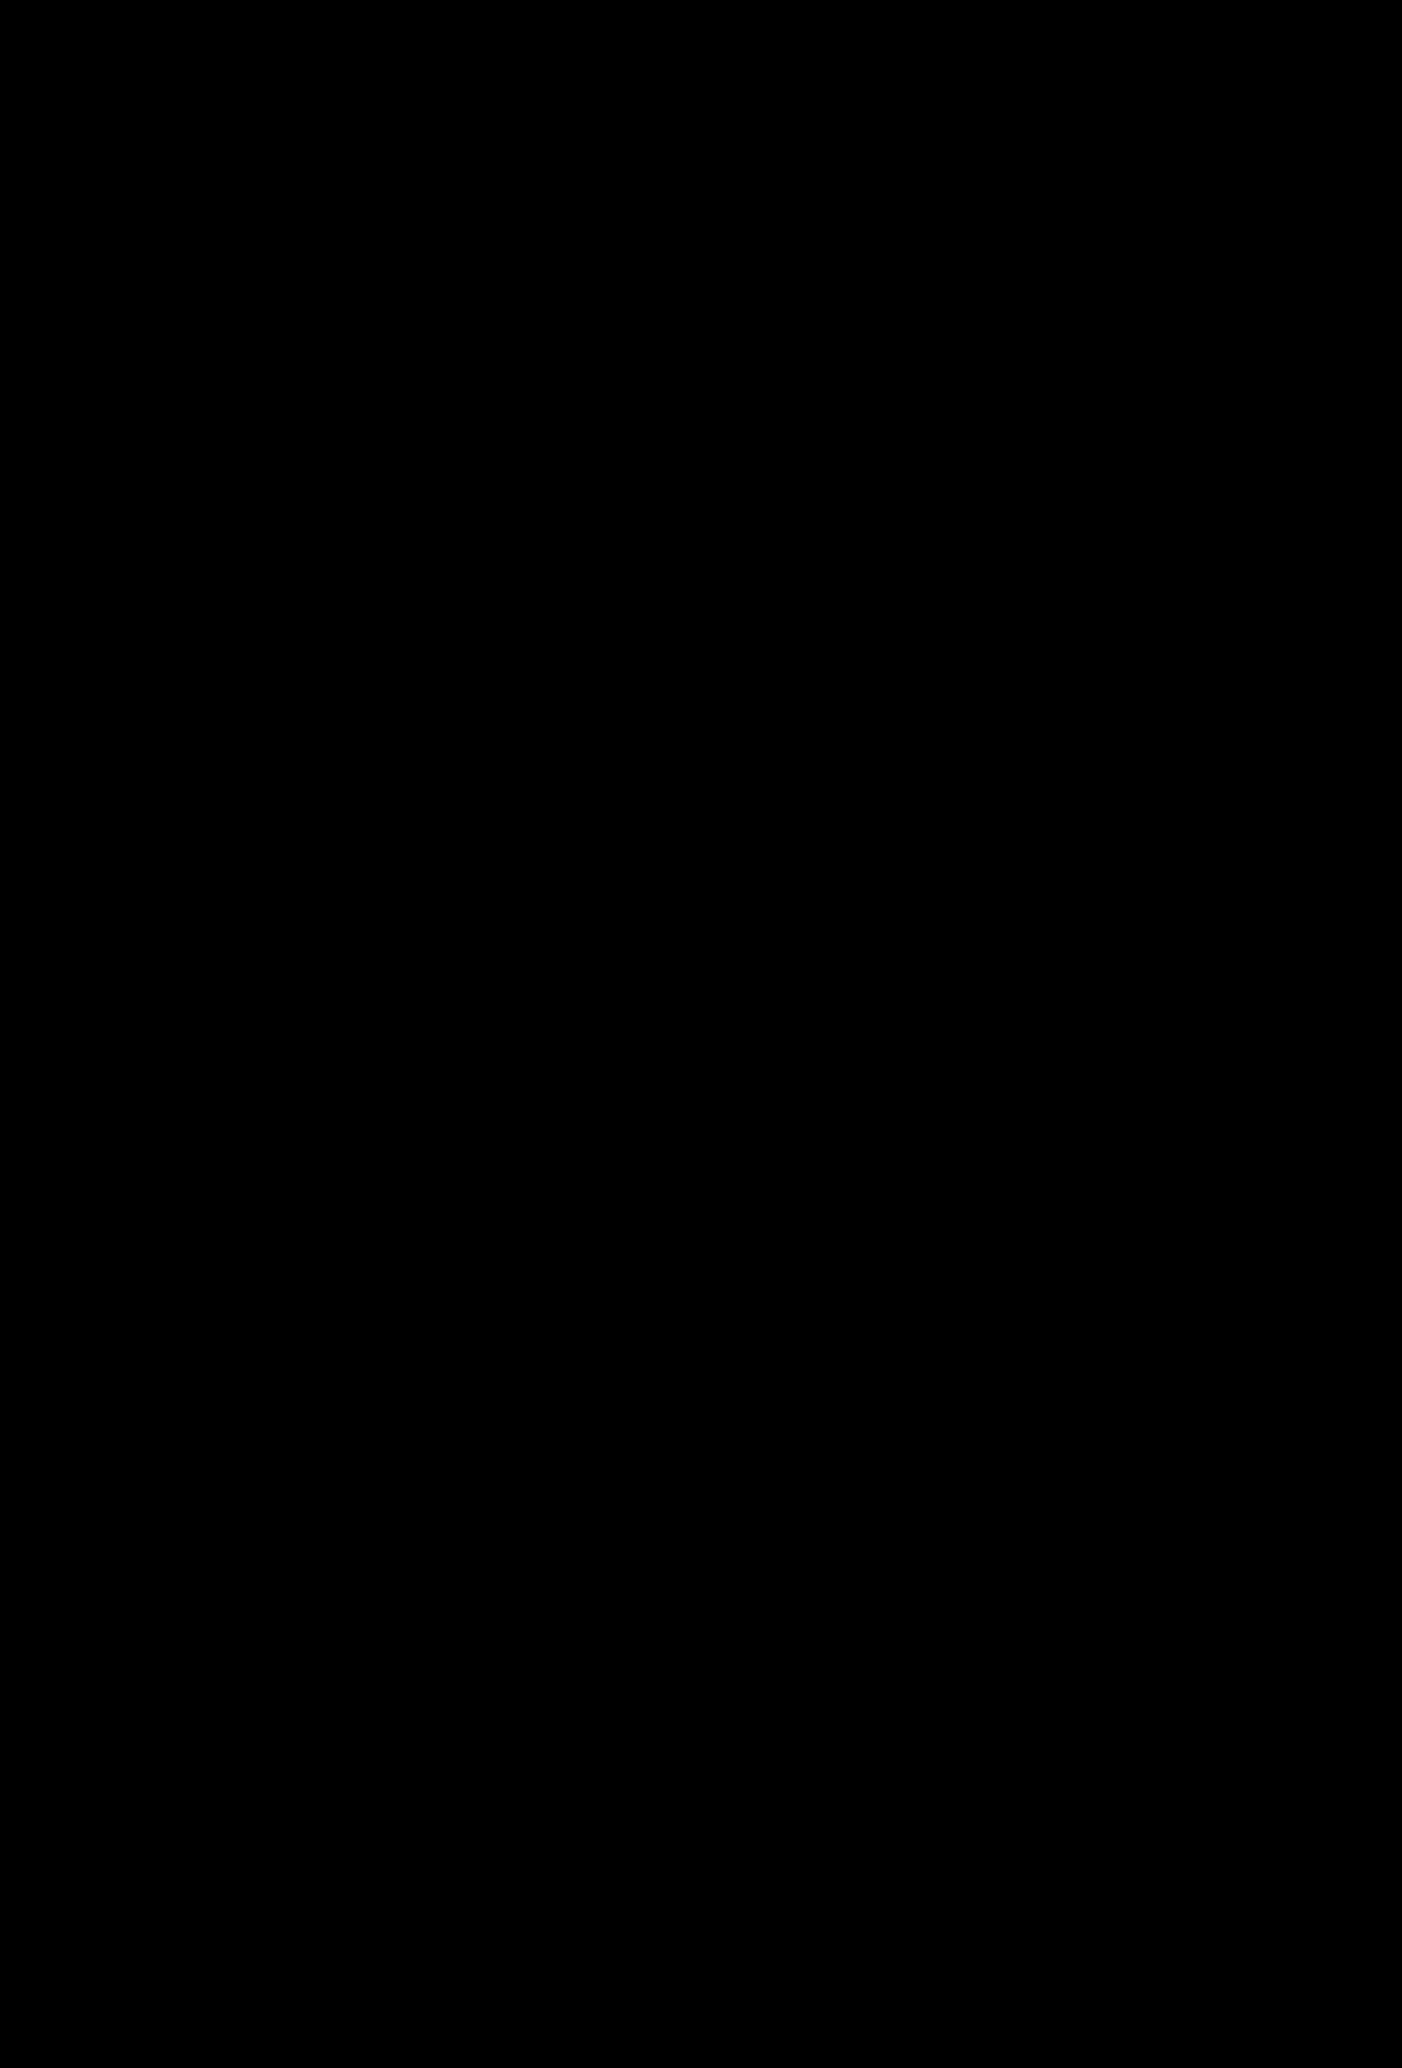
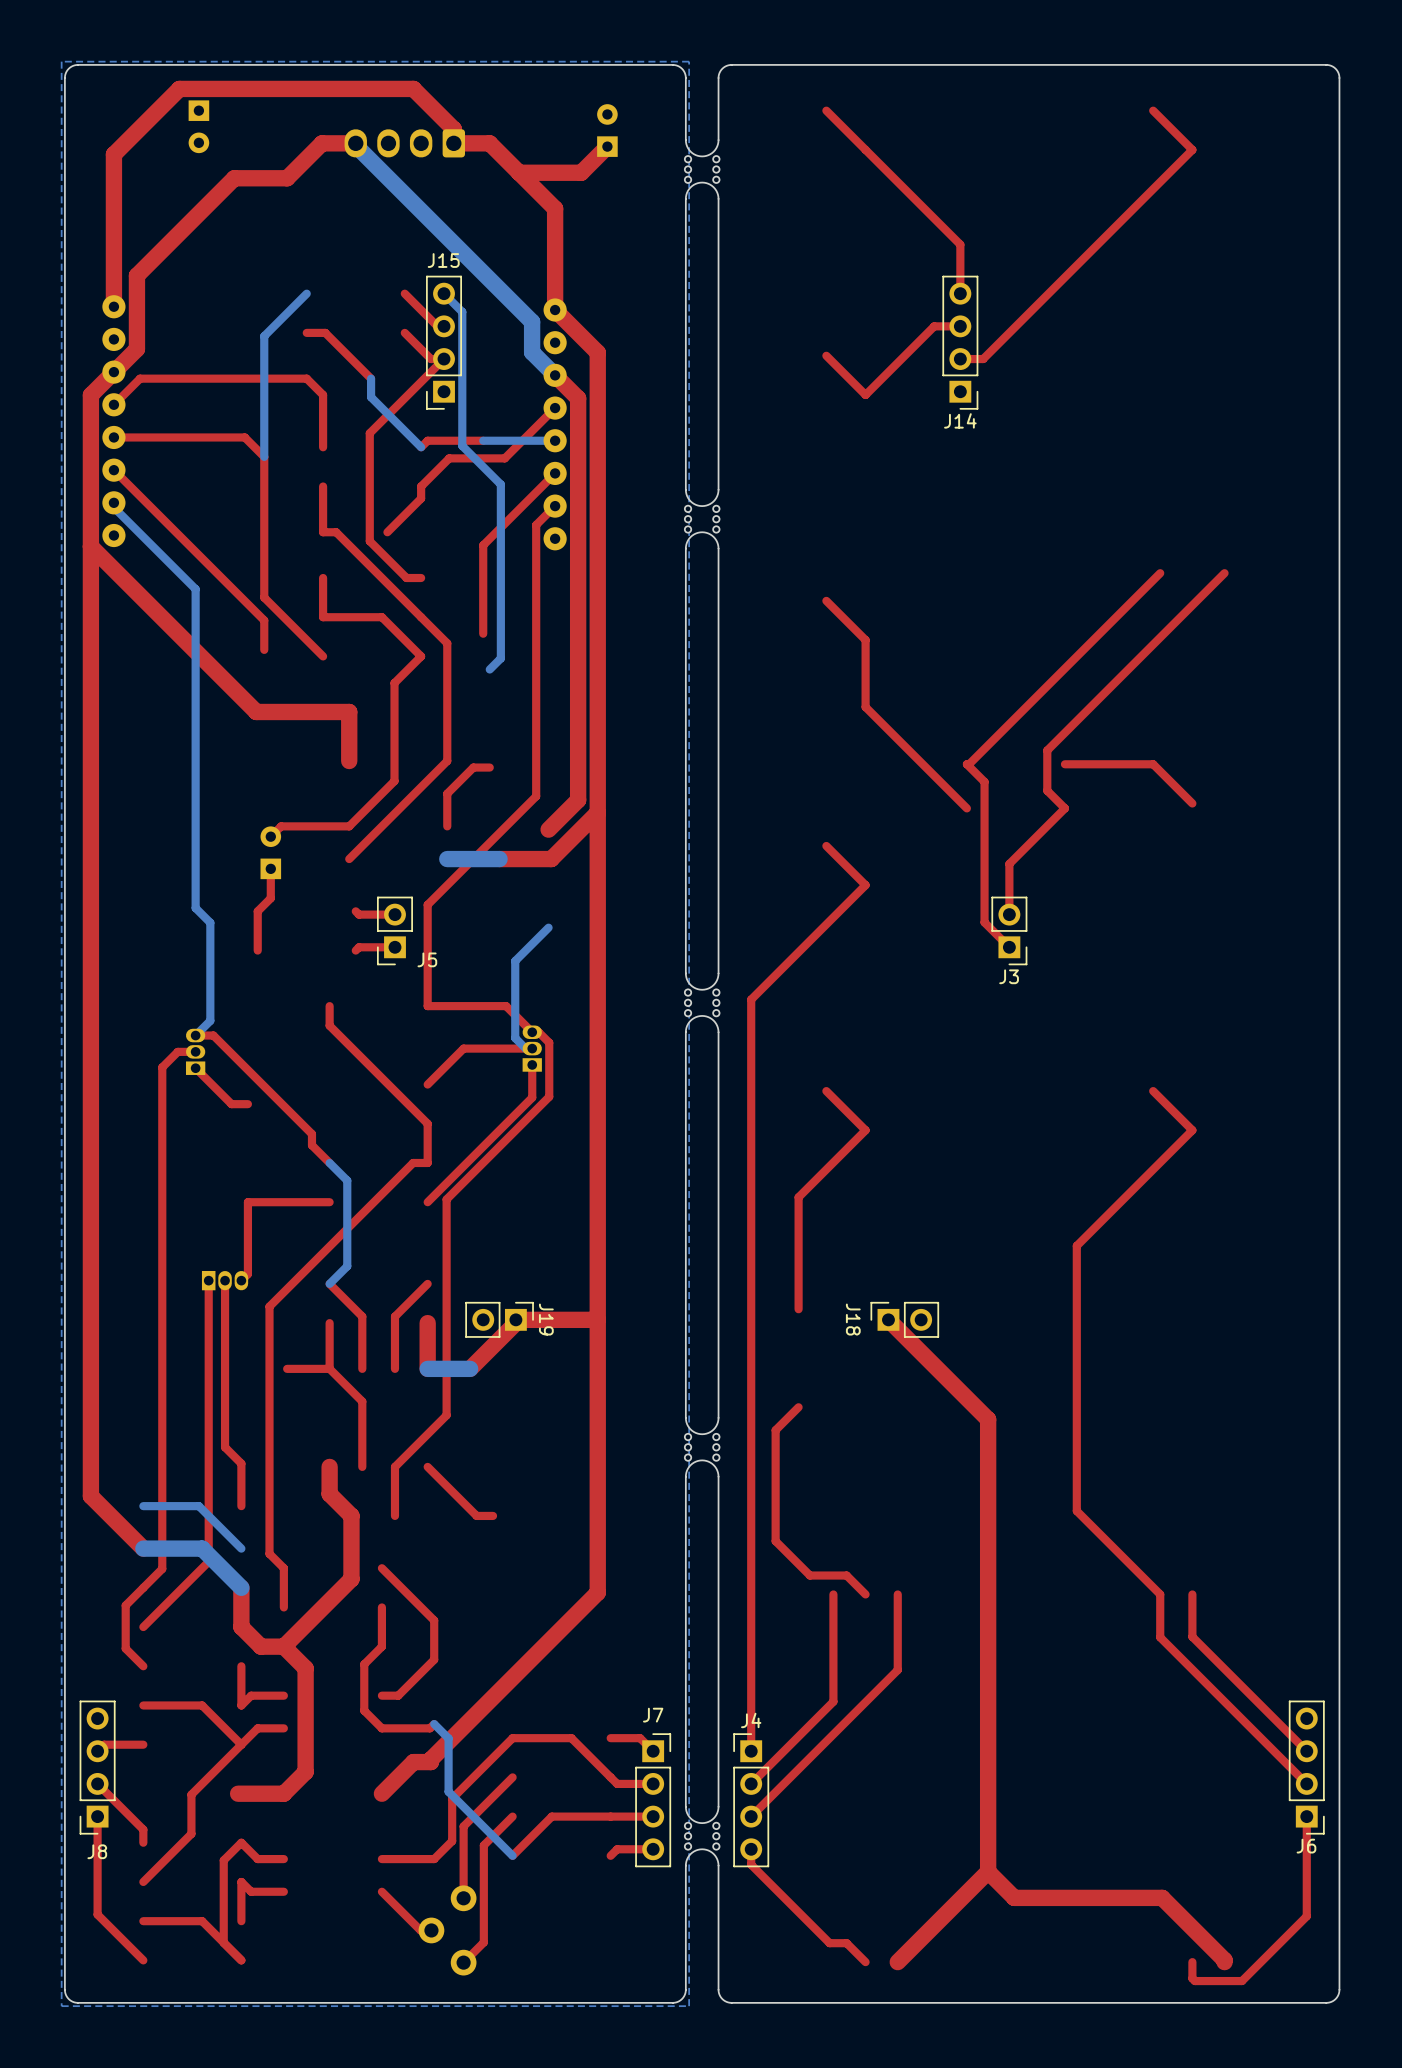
bottom zone outline: none -> (689, 61) (689, 2006) (61, 2006) (61, 61) (689, 61)
board edge: none -> (1326, 64) (729, 65) (722, 68) (718, 76) (717, 144) (712, 153) (702, 156) (692, 153) (686, 144) (685, 76) (682, 68) (674, 65) (77, 64) (71, 66) (66, 71) (64, 77) (64, 1989) (66, 1996) (71, 2001) (77, 2002) (676, 2002) (682, 1999) (685, 1991) (685, 1863) (690, 1854) (702, 1849) (713, 1854) (718, 1863) (718, 1991) (721, 1997) (728, 2002) (1326, 2002) (1332, 2001) (1337, 1996) (1339, 1989) (1339, 77) (1335, 68) (1326, 64)
top track: none -> (826, 110) (960, 244) (960, 293)
top track: none -> (1153, 110) (1192, 149) (983, 359) (960, 359)
part: none -> (198, 126)
part: none -> (607, 130)
part: none -> (404, 143)
top track: none -> (355, 145) (355, 143) (322, 143) (287, 178) (234, 178) (136, 275) (136, 349) (90, 395) (90, 1496) (143, 1548)
bottom track: none -> (355, 145) (532, 321) (532, 352) (555, 375)
top track: none -> (607, 146) (581, 172) (519, 172)
part: none -> (702, 169)
board edge: none -> (718, 198) (718, 489) (713, 501) (702, 506) (690, 501) (685, 489) (685, 198) (690, 187) (702, 182) (713, 187) (718, 198)
bottom track: none -> (306, 293) (264, 336) (264, 456)
top track: none -> (404, 293) (437, 326) (444, 326)
bottom track: none -> (444, 293) (462, 311) (462, 445) (500, 484) (500, 658) (489, 669)
top track: none -> (113, 306) (113, 154) (179, 88) (413, 88) (453, 129) (453, 143) (489, 143) (555, 208) (555, 310) (597, 352) (597, 1592) (430, 1759) (430, 1762) (413, 1762) (381, 1793)
top track: none -> (960, 326) (934, 326) (865, 394) (826, 355)
top track: none -> (306, 332) (325, 332) (371, 378)
top track: none -> (404, 332) (430, 359) (444, 359) (369, 433) (369, 541) (406, 578) (421, 578)
J15: none -> (444, 342)
J14: none -> (960, 342)
top track: none -> (555, 375) (578, 398) (578, 800) (548, 829)
bottom track: none -> (371, 378) (371, 397) (421, 447)
top track: none -> (113, 404) (140, 378) (306, 378) (323, 394) (323, 447)
top track: none -> (555, 408) (504, 458) (449, 458) (421, 486) (421, 498) (387, 532)
part: none -> (113, 421)
part: none -> (555, 424)
top track: none -> (113, 437) (244, 437) (264, 456) (264, 597) (323, 656)
top track: none -> (483, 440) (427, 440) (421, 447)
bottom track: none -> (555, 440) (483, 440)
top track: none -> (113, 470) (264, 620) (264, 649)
top track: none -> (555, 473) (483, 545) (483, 633)
top track: none -> (323, 486) (323, 532) (336, 532) (447, 643) (447, 761) (349, 859)
bottom track: none -> (113, 502) (113, 507) (195, 589) (195, 908) (210, 922) (210, 1020) (195, 1035)
top track: none -> (555, 506) (536, 525) (536, 796) (427, 904) (427, 1006) (506, 1006) (532, 1032) (538, 1032) (549, 1042) (549, 1096) (446, 1199) (446, 1415) (394, 1466) (394, 1515)
part: none -> (702, 519)
top track: none -> (90, 546) (256, 711) (349, 711) (349, 761)
board edge: none -> (718, 548) (718, 973) (713, 984) (702, 989) (690, 984) (685, 973) (685, 548) (690, 537) (702, 532) (713, 537) (718, 548)
top track: none -> (1160, 573) (969, 764) (966, 764) (984, 781) (984, 922) (1009, 947)
top track: none -> (1224, 573) (1047, 750) (1047, 790) (1064, 808) (1009, 863) (1009, 914)
top track: none -> (323, 578) (323, 617) (381, 617) (421, 656) (394, 683) (394, 781) (349, 826) (281, 826) (270, 836)
top track: none -> (826, 600) (865, 640) (865, 707) (966, 808)
top track: none -> (1064, 764) (1153, 764) (1192, 803)
top track: none -> (489, 767) (473, 767) (447, 793) (447, 826)
top track: none -> (597, 812) (551, 859) (499, 859)
top track: none -> (826, 845) (865, 885) (751, 999) (751, 1751)
part: none -> (270, 852)
bottom track: none -> (499, 859) (447, 859)
top track: none -> (270, 868) (270, 898) (257, 911) (257, 950)
top track: none -> (355, 911) (359, 914) (394, 914)
bottom track: none -> (548, 927) (515, 961) (515, 1038) (525, 1048) (532, 1048)
J5: none -> (394, 930)
J3: none -> (1009, 930)
top track: none -> (394, 947) (359, 947) (355, 950)
part: none -> (702, 1002)
top track: none -> (329, 1006) (329, 1025) (427, 1123) (427, 1162) (413, 1162) (269, 1306) (269, 1553) (283, 1568) (283, 1607)
board edge: none -> (718, 1032) (718, 1417) (713, 1429) (702, 1434) (690, 1429) (685, 1417) (685, 1032) (690, 1020) (702, 1015) (713, 1020) (718, 1032)
top track: none -> (195, 1035) (213, 1035) (311, 1134) (311, 1145) (329, 1162)
top track: none -> (532, 1048) (463, 1048) (427, 1084)
part: none -> (532, 1048)
top track: none -> (195, 1051) (177, 1051) (162, 1067) (162, 1568) (125, 1605) (125, 1648) (143, 1666)
part: none -> (195, 1051)
top track: none -> (532, 1064) (532, 1097) (427, 1202)
top track: none -> (195, 1068) (231, 1104) (247, 1104)
top track: none -> (826, 1091) (865, 1130) (798, 1197) (798, 1309)
top track: none -> (1153, 1091) (1192, 1130) (1076, 1245) (1076, 1511) (1160, 1594) (1160, 1637) (1306, 1783)
bottom track: none -> (329, 1162) (347, 1180) (347, 1266) (329, 1283)
top track: none -> (329, 1202) (247, 1202) (247, 1274) (241, 1280)
top track: none -> (208, 1280) (208, 1561) (143, 1627)
top track: none -> (225, 1280) (225, 1447) (241, 1463) (241, 1506)
part: none -> (225, 1280)
top track: none -> (329, 1283) (362, 1316) (362, 1368)
top track: none -> (427, 1283) (394, 1316) (394, 1368)
J19: none -> (499, 1319)
top track: none -> (597, 1319) (515, 1319) (515, 1323) (470, 1368)
top track: none -> (888, 1319) (988, 1419) (988, 1871)
J18: none -> (904, 1319)
top track: none -> (329, 1323) (329, 1368)
top track: none -> (427, 1323) (427, 1368)
top track: none -> (329, 1368) (362, 1401) (362, 1466)
top track: none -> (329, 1368) (287, 1368)
bottom track: none -> (470, 1368) (427, 1368)
top track: none -> (798, 1407) (775, 1430) (775, 1541) (809, 1575) (846, 1575) (865, 1594)
part: none -> (702, 1447)
top track: none -> (329, 1466) (329, 1494) (351, 1515) (351, 1579) (283, 1646)
top track: none -> (427, 1466) (476, 1515) (493, 1515)
board edge: none -> (718, 1476) (718, 1806) (713, 1818) (702, 1823) (690, 1818) (685, 1806) (685, 1476) (690, 1465) (702, 1460) (713, 1465) (718, 1476)
bottom track: none -> (143, 1506) (198, 1506) (241, 1548)
bottom track: none -> (143, 1548) (202, 1548) (241, 1587)
top track: none -> (381, 1568) (434, 1620) (434, 1659) (398, 1695) (381, 1695)
top track: none -> (241, 1587) (241, 1627) (261, 1646) (283, 1646)
top track: none -> (833, 1594) (833, 1701) (751, 1783)
top track: none -> (897, 1594) (897, 1670) (751, 1816)
top track: none -> (1192, 1594) (1192, 1636) (1306, 1751)
top track: none -> (381, 1607) (381, 1646) (364, 1664) (364, 1710) (381, 1728) (429, 1728) (434, 1724)
top track: none -> (283, 1646) (305, 1668) (305, 1771) (283, 1793) (238, 1793)
top track: none -> (241, 1666) (241, 1705) (251, 1695) (283, 1695)
top track: none -> (143, 1705) (202, 1705) (241, 1744)
bottom track: none -> (434, 1724) (448, 1738) (448, 1791) (512, 1855)
top track: none -> (283, 1728) (257, 1728) (191, 1794) (191, 1833) (143, 1881)
top track: none -> (610, 1738) (640, 1738) (653, 1751)
top track: none -> (143, 1744) (104, 1744) (97, 1751)
J8: none -> (97, 1767)
J6: none -> (1306, 1767)
top track: none -> (512, 1777) (463, 1826) (463, 1898)
top track: none -> (97, 1783) (143, 1829) (143, 1842)
top track: none -> (653, 1783) (617, 1783) (571, 1738) (512, 1738) (452, 1798) (452, 1841) (434, 1859) (381, 1859)
J7: none -> (653, 1800)
J4: none -> (751, 1800)
top track: none -> (97, 1816) (97, 1914) (143, 1960)
top track: none -> (512, 1816) (483, 1845) (483, 1942) (463, 1962)
top track: none -> (653, 1816) (551, 1816) (512, 1855)
top track: none -> (1306, 1816) (1306, 1916) (1242, 1981) (1194, 1981) (1192, 1978) (1192, 1962)
part: none -> (702, 1836)
top track: none -> (653, 1849) (617, 1849) (610, 1855)
top track: none -> (751, 1849) (751, 1864) (829, 1943) (846, 1943) (865, 1962)
top track: none -> (283, 1859) (257, 1859) (241, 1842) (223, 1860) (223, 1942)
top track: none -> (988, 1871) (897, 1962)
top track: none -> (988, 1871) (1014, 1897) (1162, 1897) (1224, 1962)
top track: none -> (283, 1891) (251, 1891) (241, 1881) (241, 1921)
top track: none -> (381, 1891) (420, 1930) (431, 1930)
top track: none -> (143, 1921) (202, 1921) (241, 1960)
part: none -> (447, 1930)

